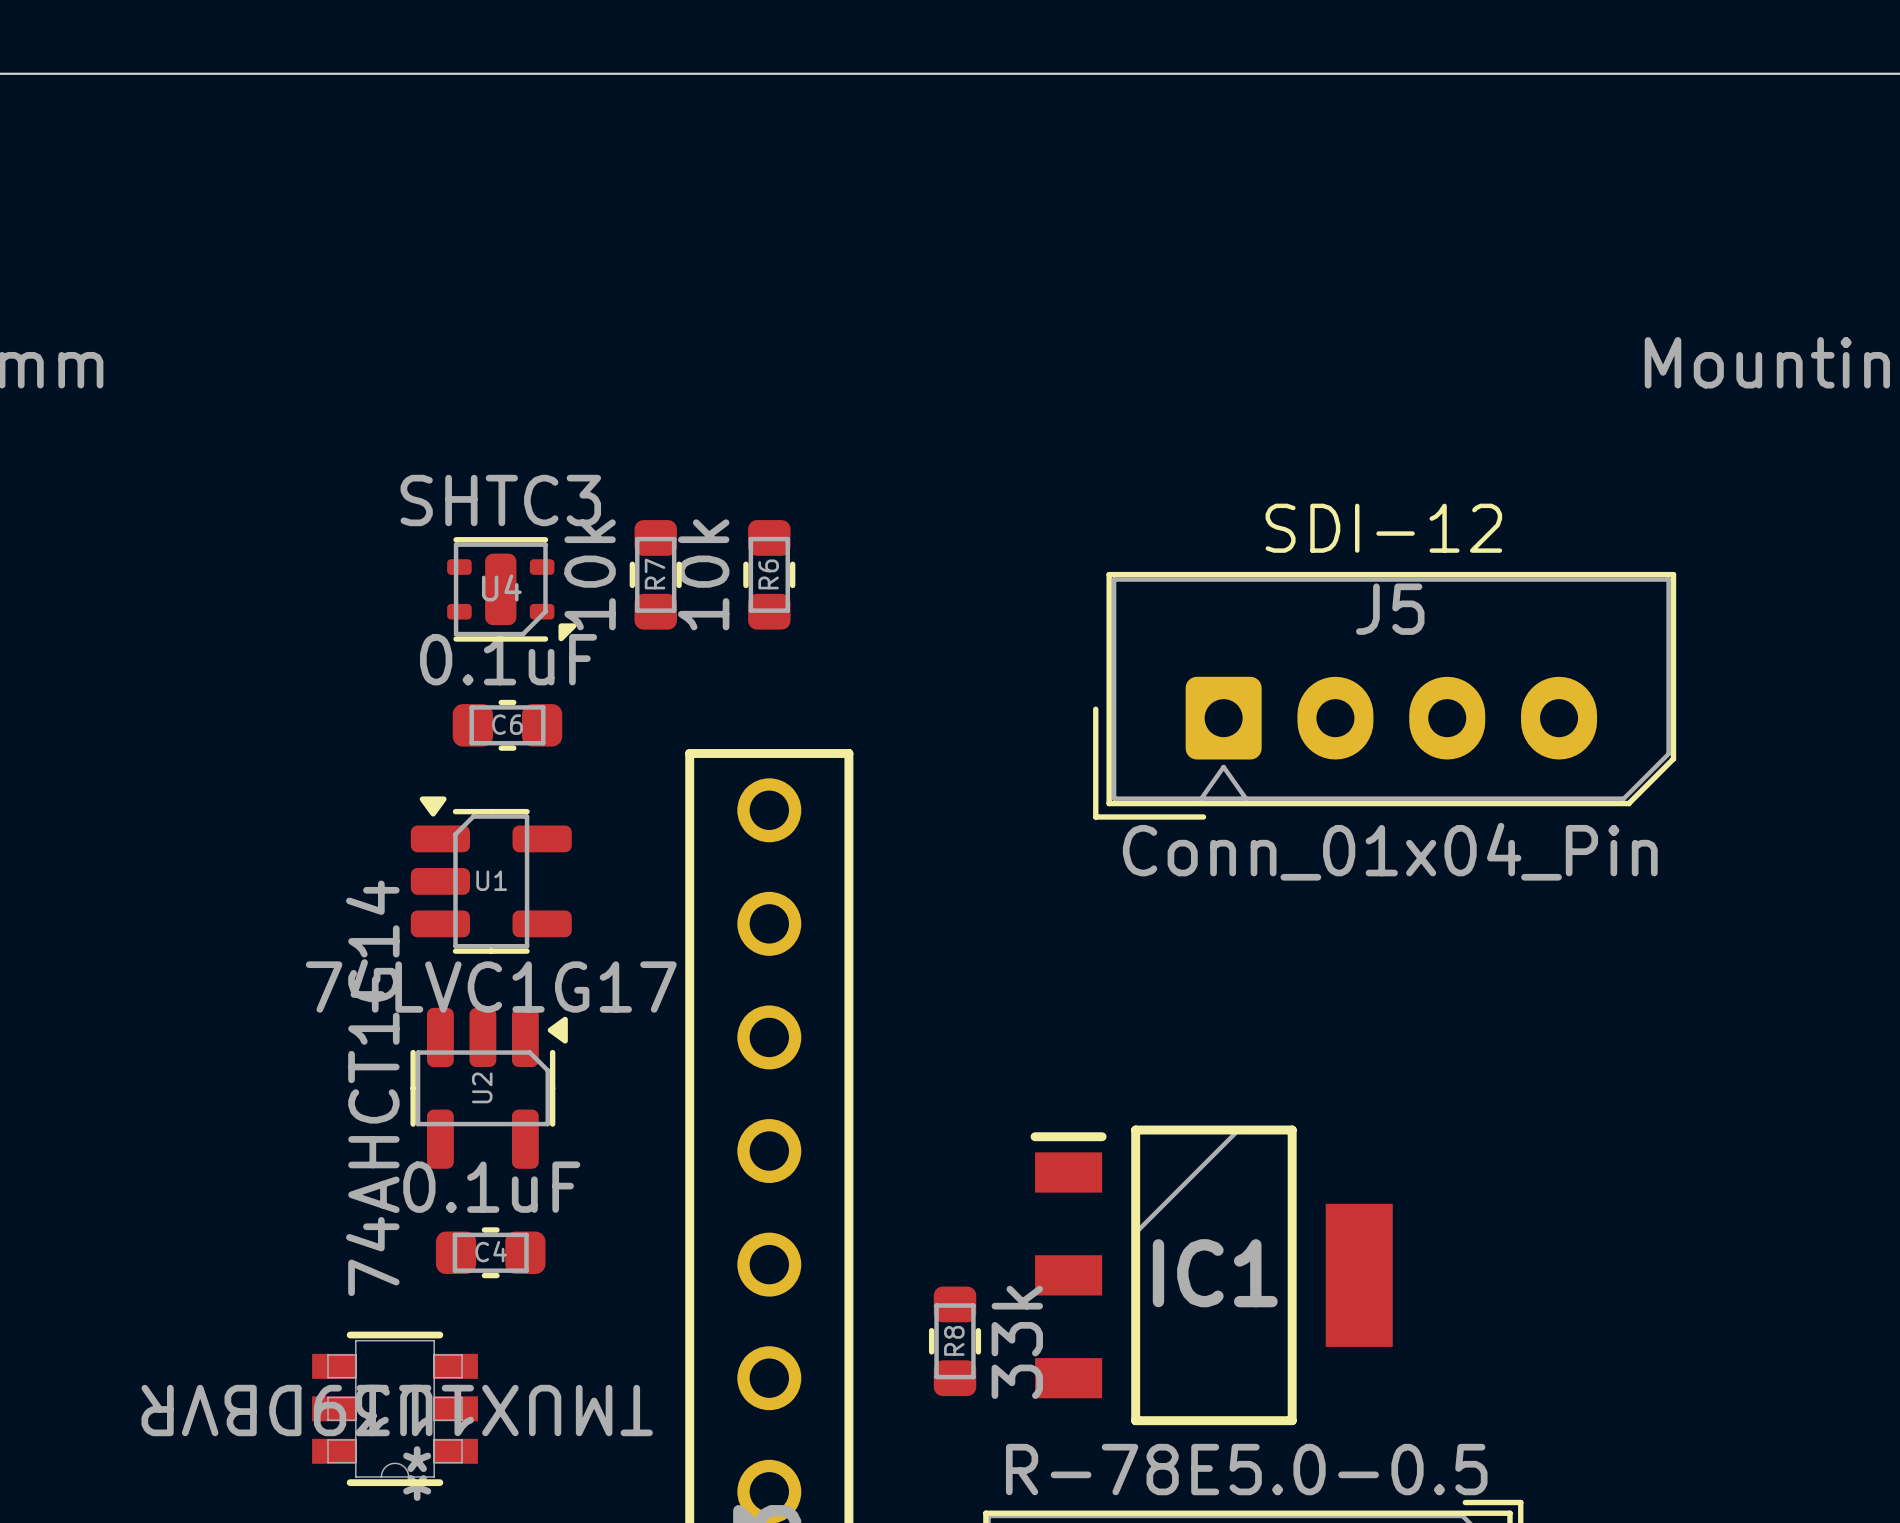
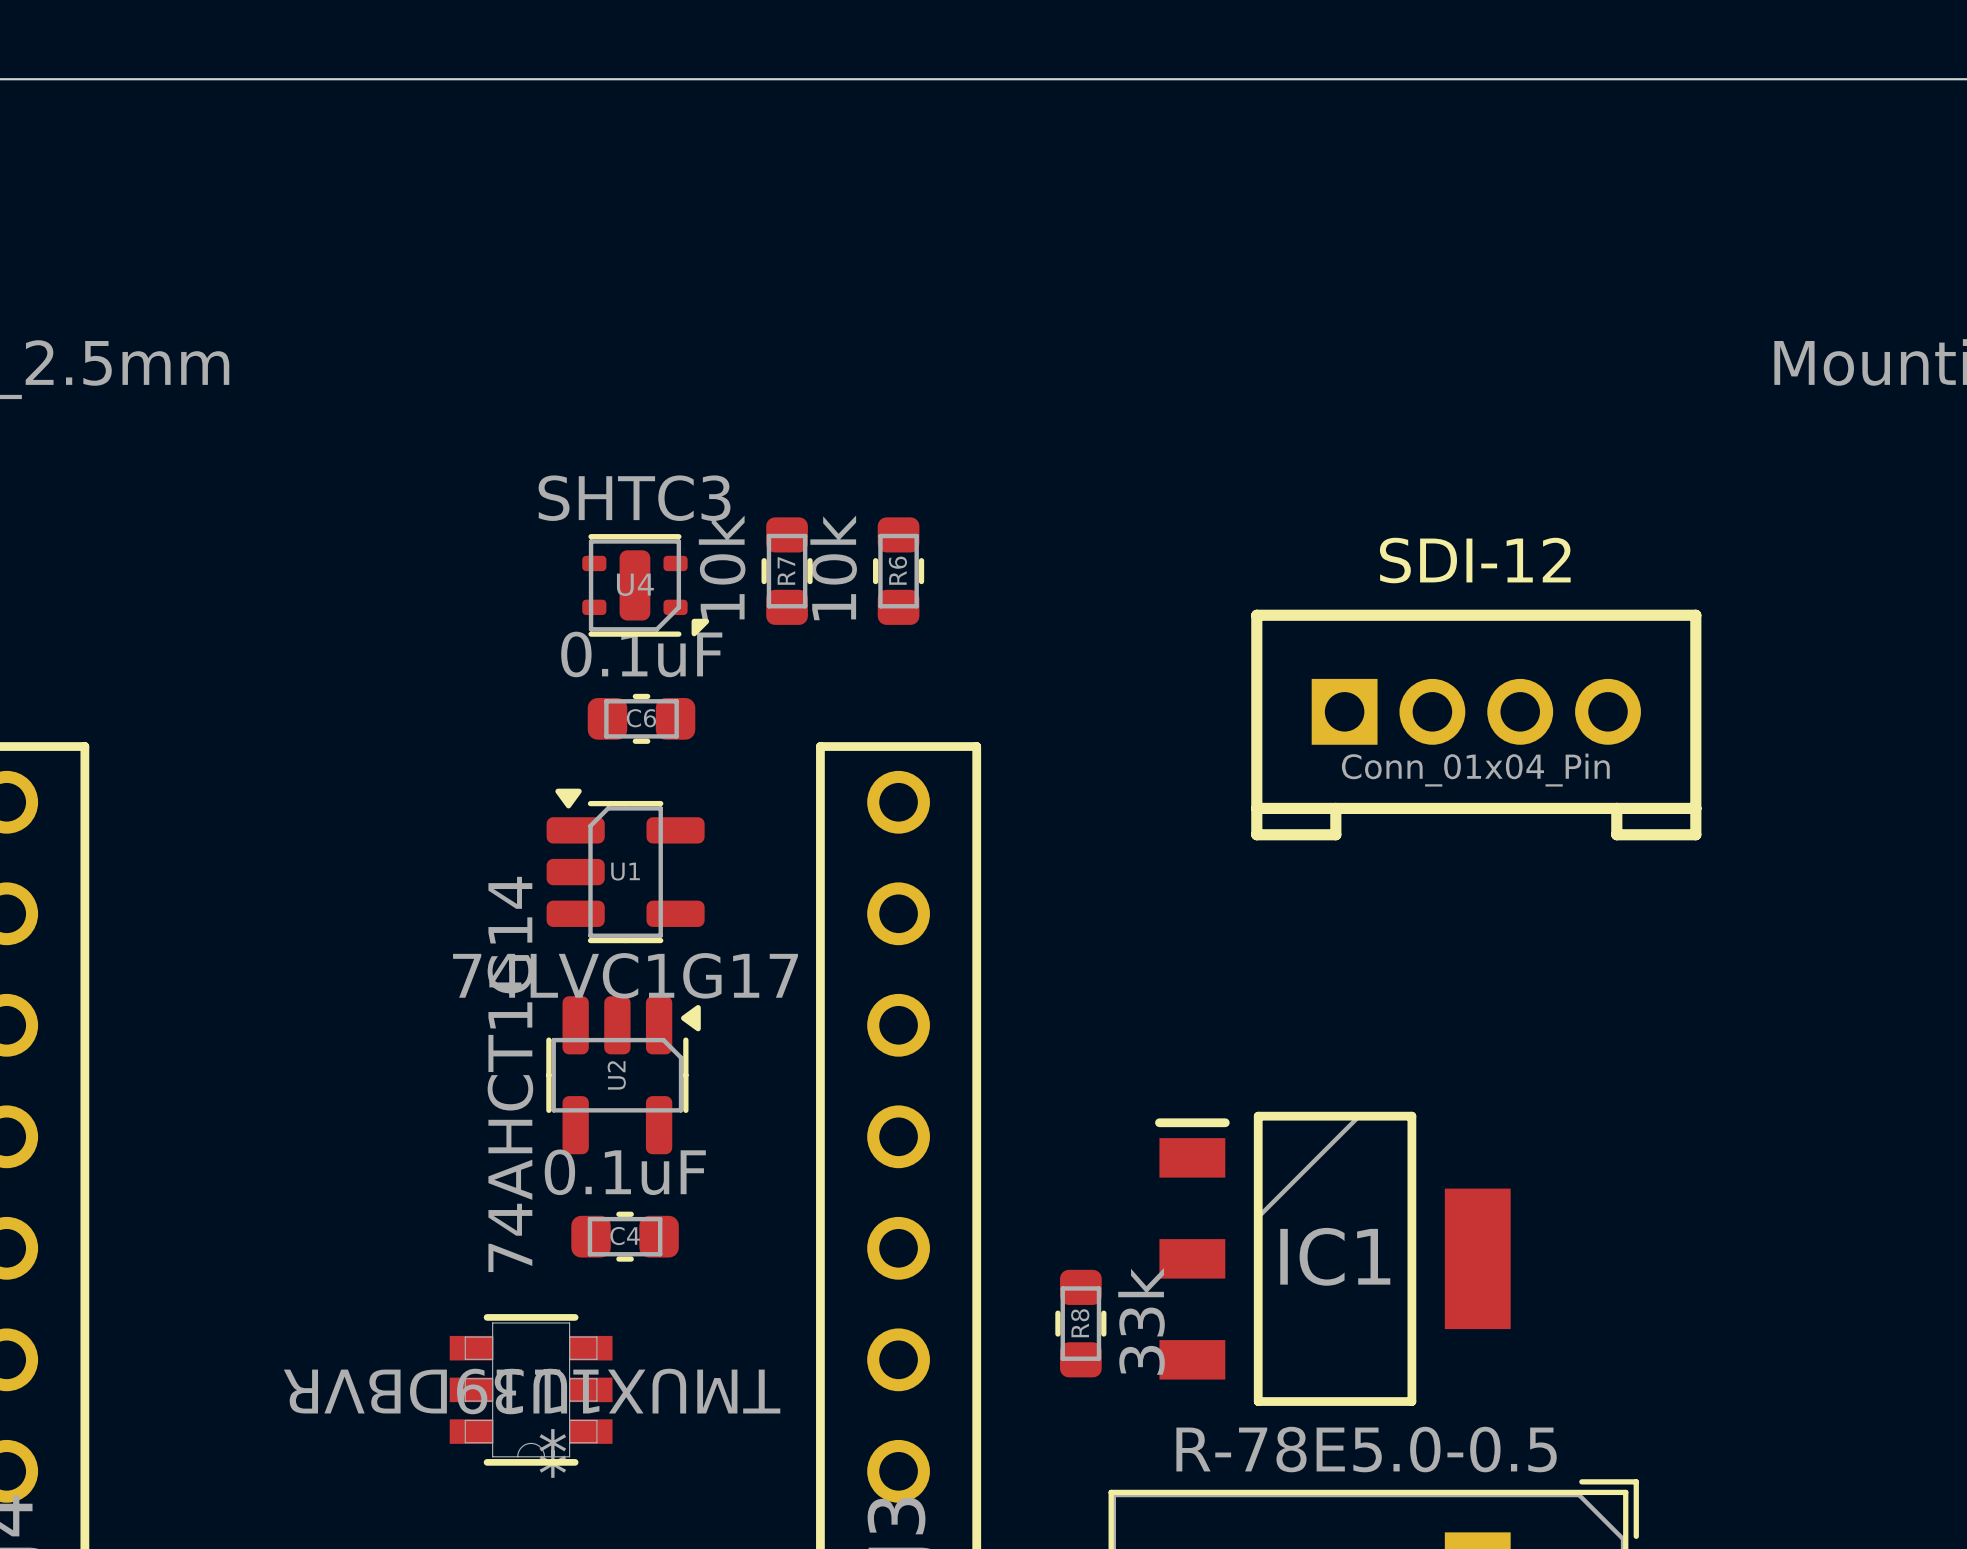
text position: SDI-12 (1383, 528) -> SDI-12 (1475, 560)
J5: Conn_01x04_Pin (1384, 695) -> none
part: none -> Conn_01x04_Pin (1476, 725)

